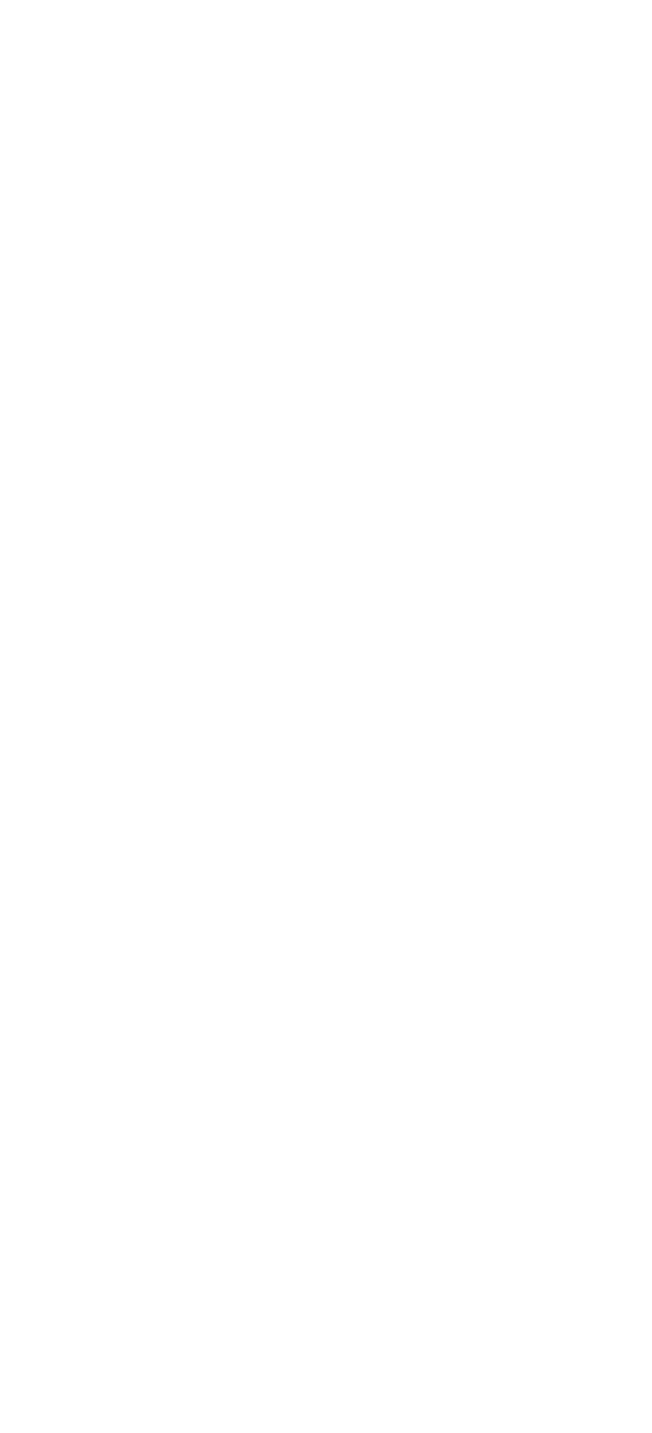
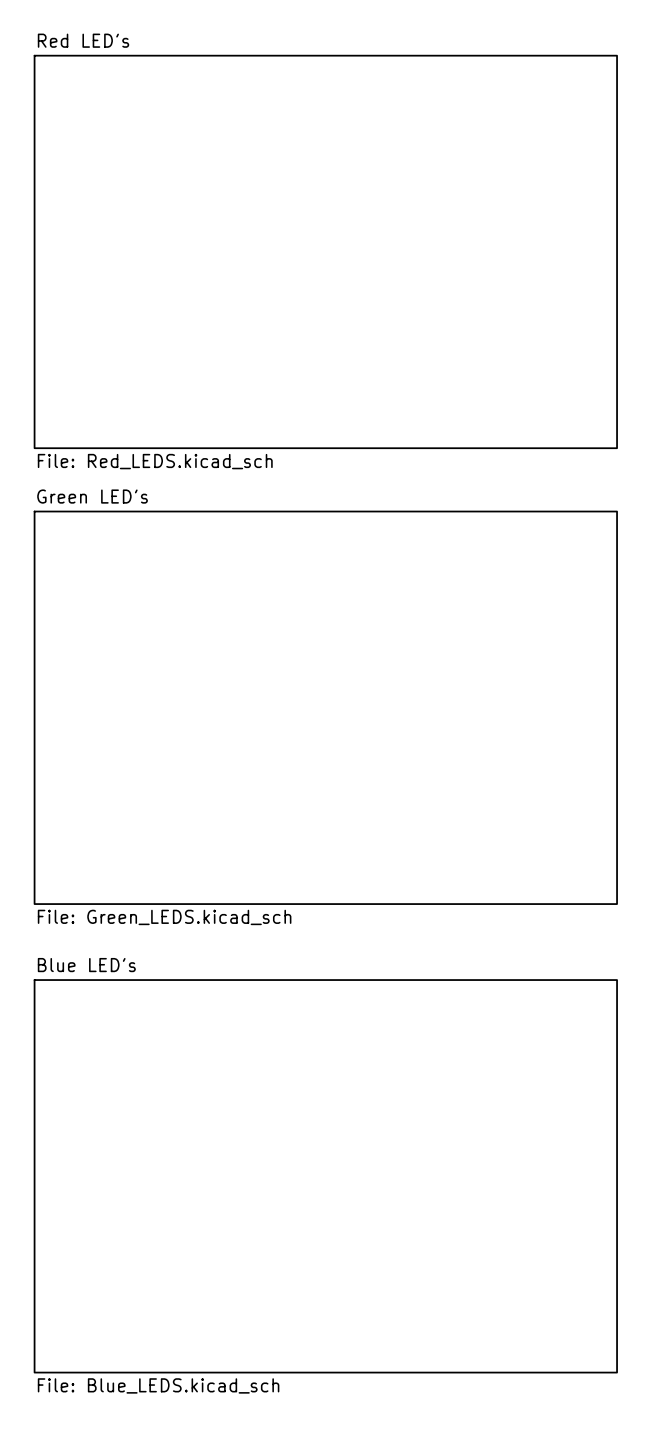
sheet Red LED's: none -> File: Red_LEDS.kicad_sch (325, 251)
sheet Green LED's: none -> File: Green_LEDS.kicad_sch (325, 707)
sheet Blue LED's: none -> File: Blue_LEDS.kicad_sch (325, 1176)

